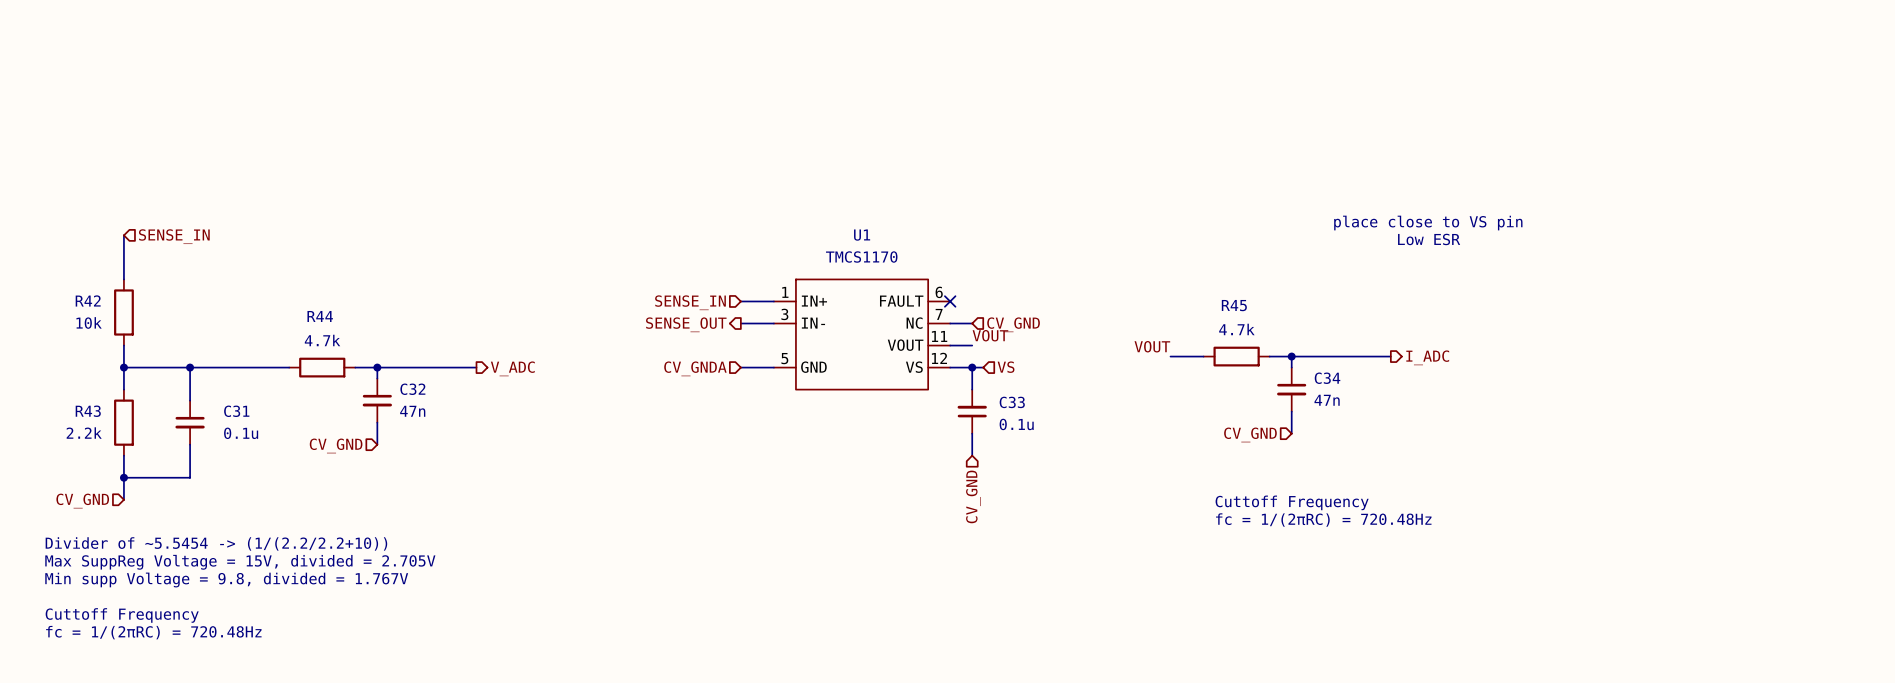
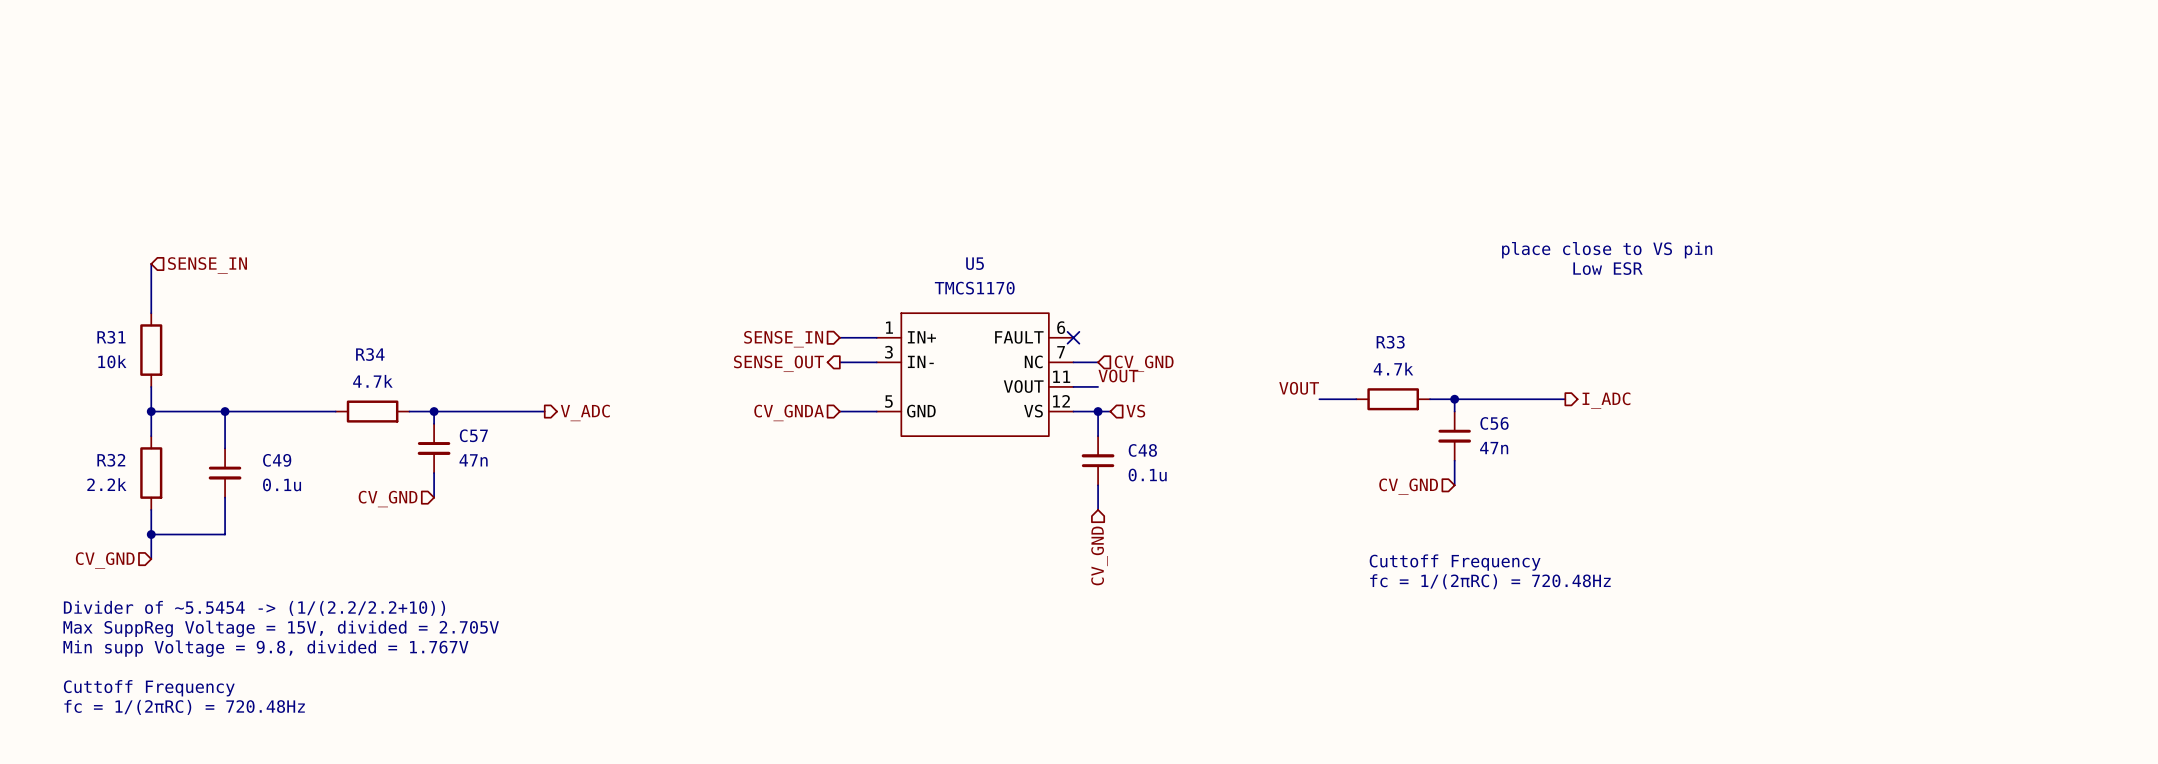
U1 name: U1 (862, 235) -> U5 (975, 263)
R42 name: R42 (88, 300) -> R31 (111, 337)
R45 name: R45 (1234, 305) -> R33 (1390, 342)
R44 name: R44 (320, 316) -> R34 (370, 354)
C34 name: C34 (1327, 378) -> C56 (1494, 423)
C32 name: C32 (412, 389) -> C57 (473, 435)
C33 name: C33 (1012, 402) -> C48 (1142, 450)
R43 name: R43 (88, 411) -> R32 (111, 460)
C31 name: C31 (236, 411) -> C49 (277, 460)

